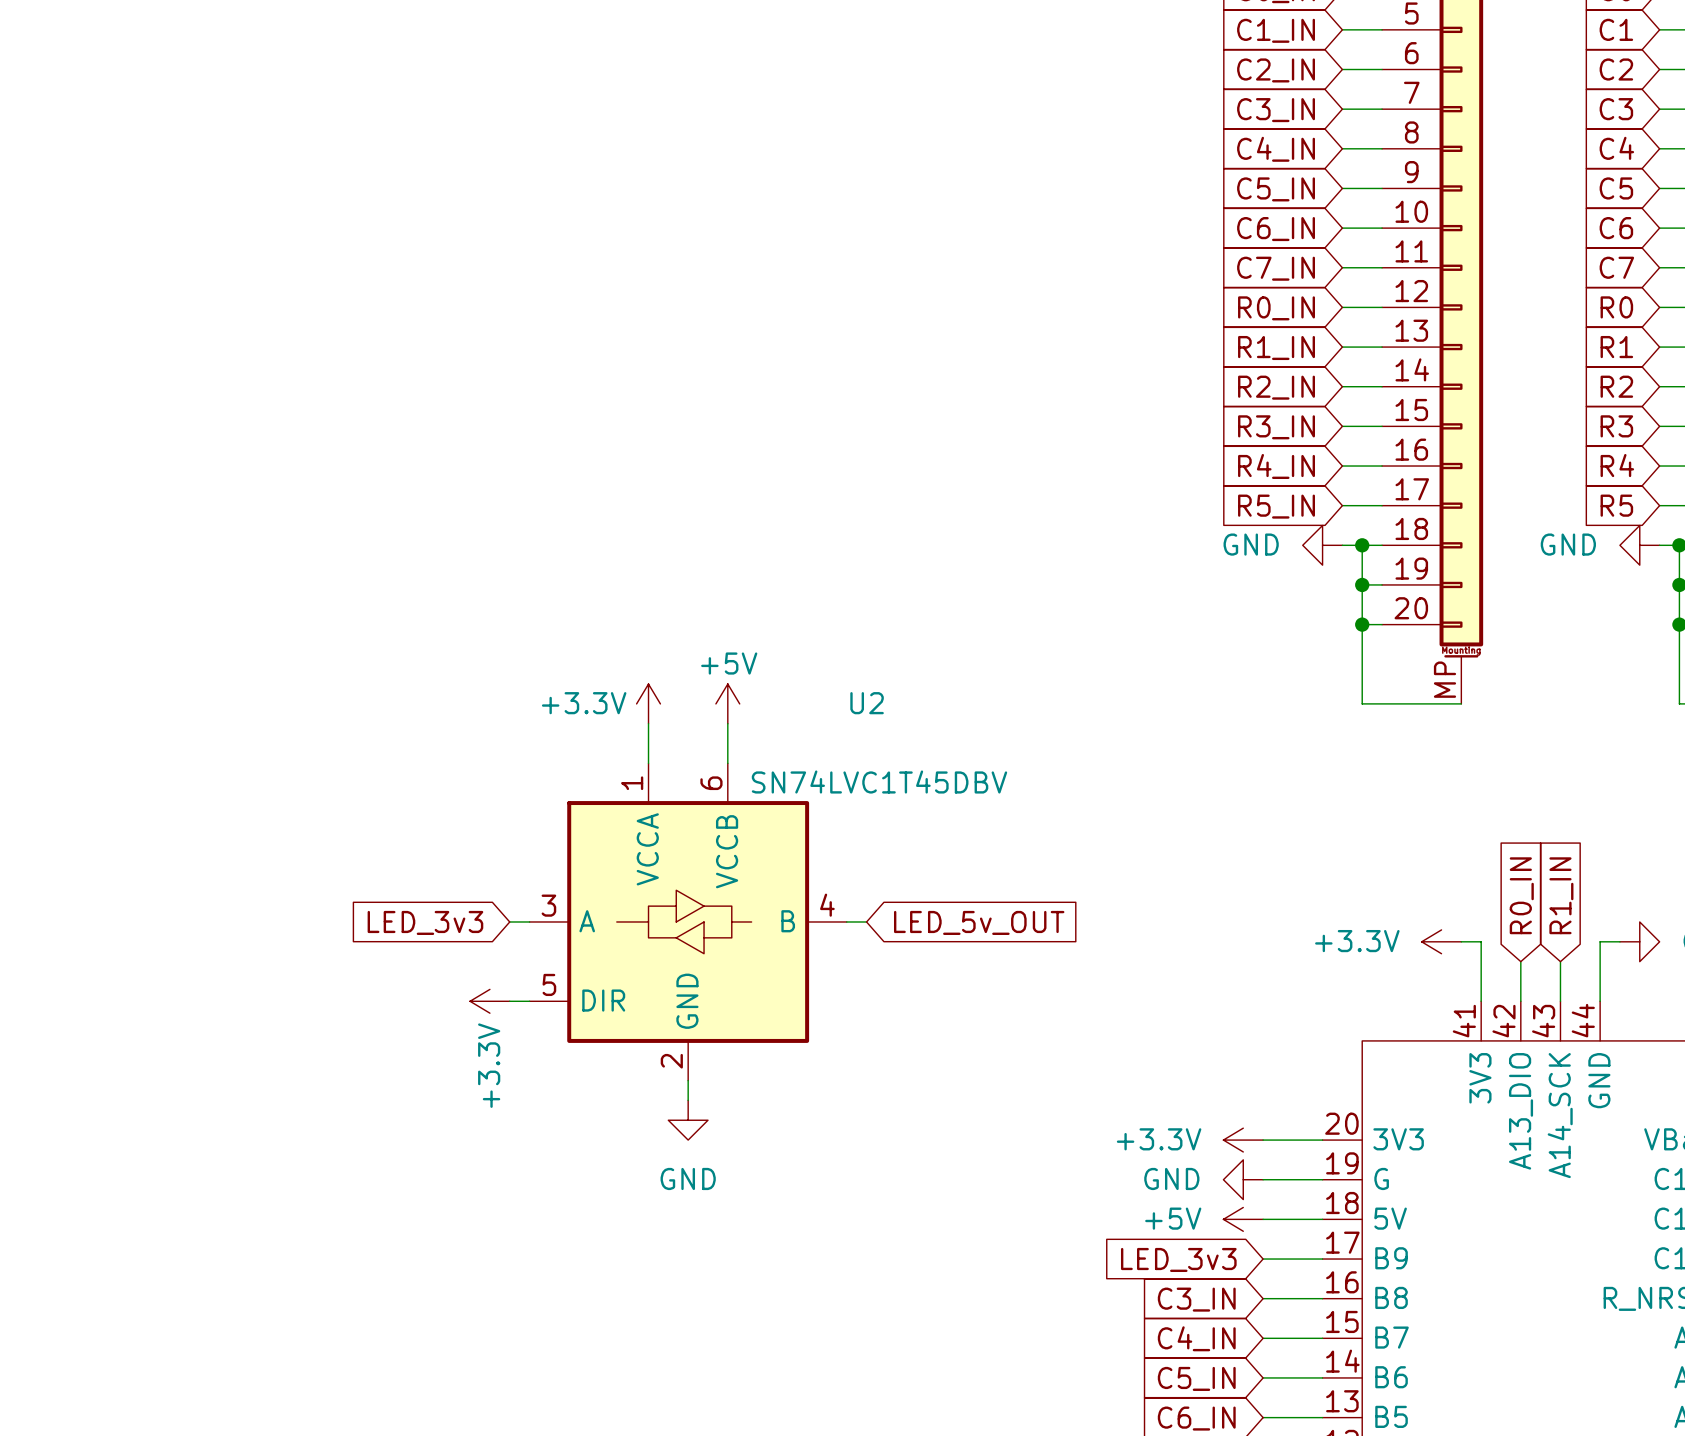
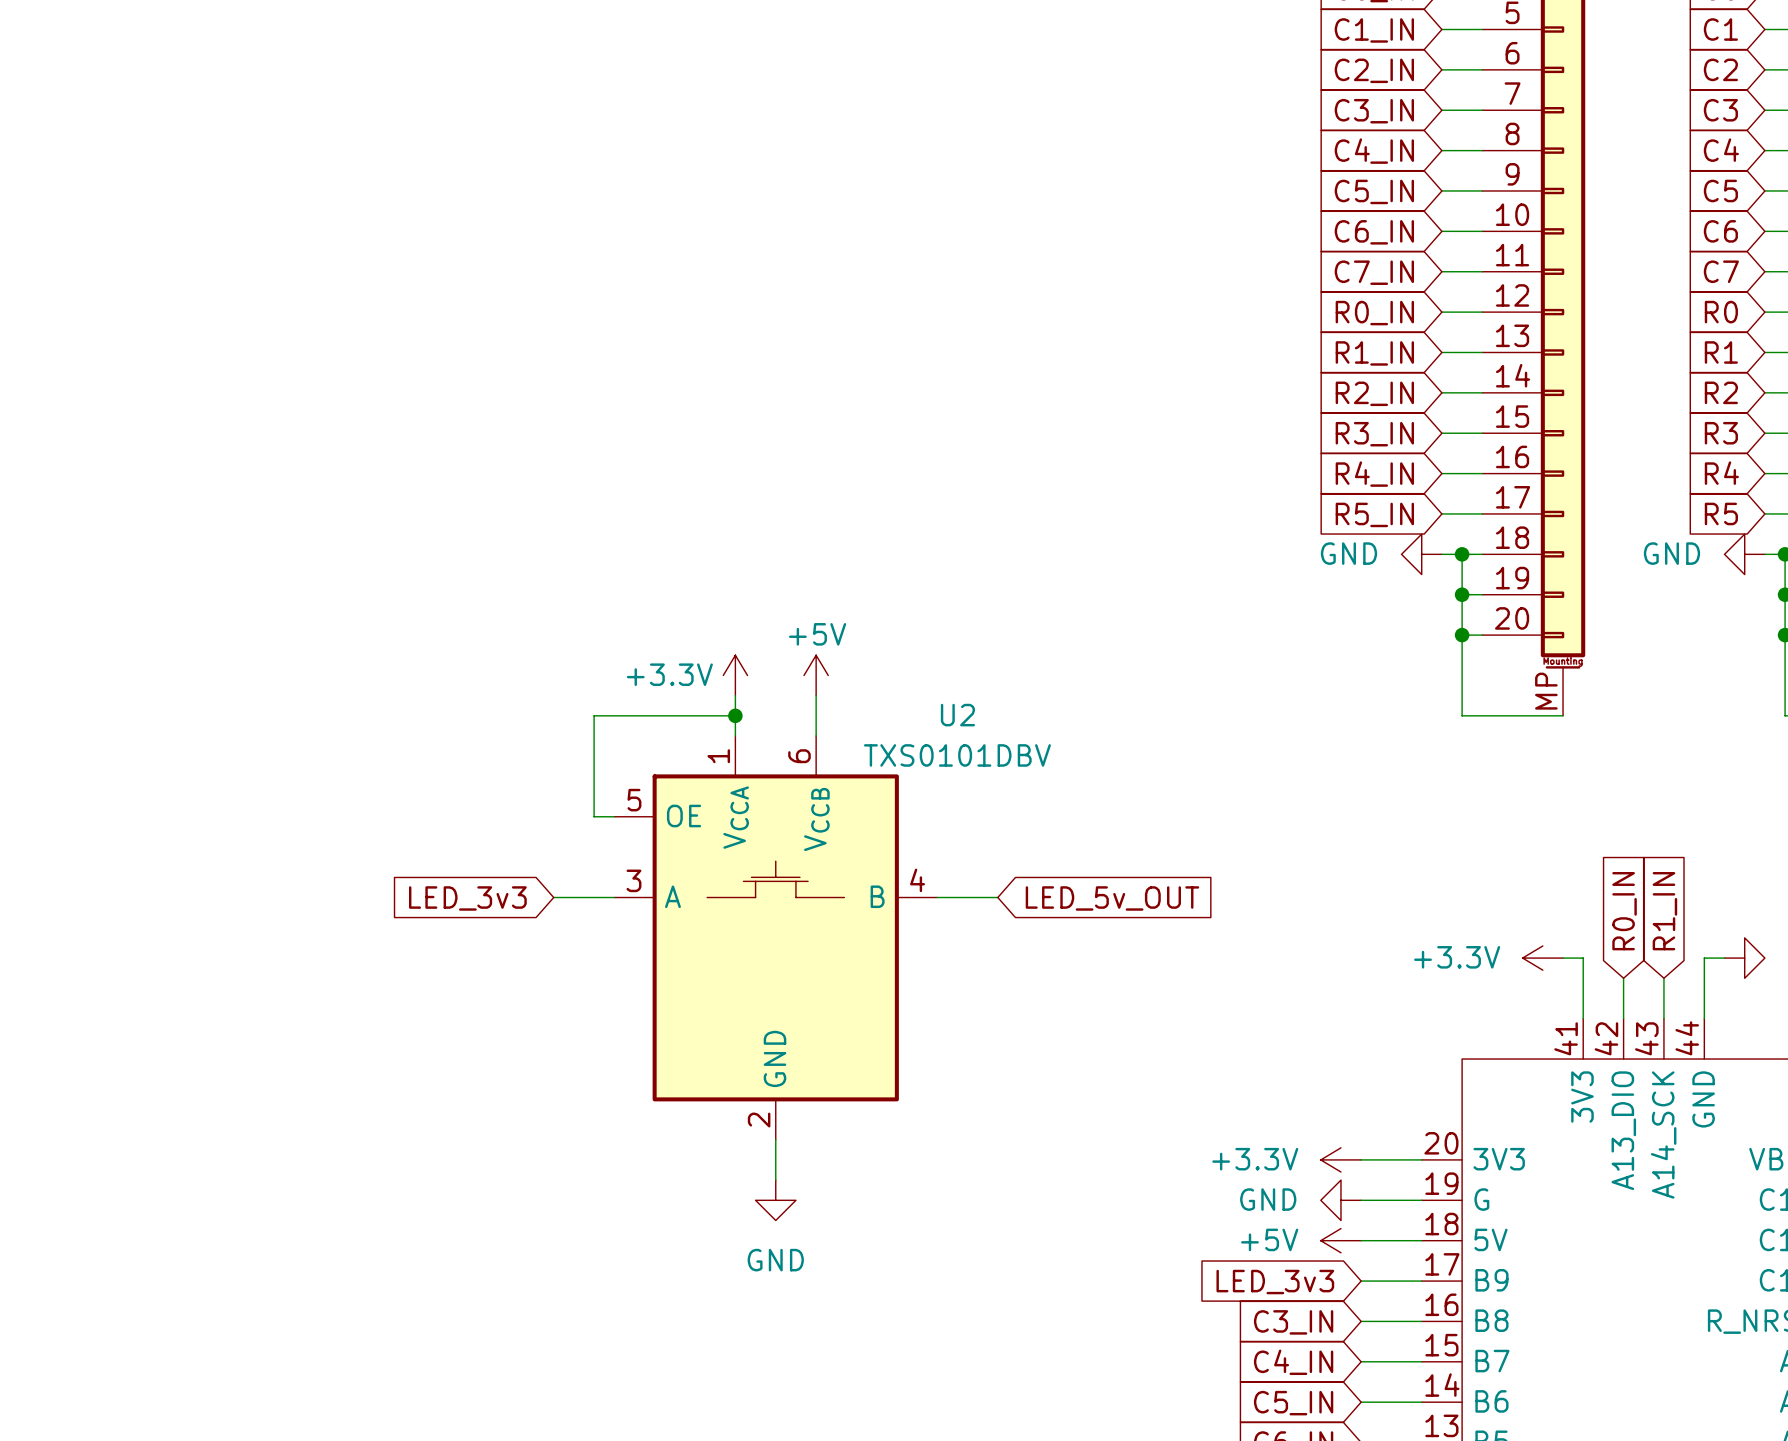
wire: none -> (735, 715) (594, 715) (594, 816) (614, 816)
power symbol position: +3.3V (648, 703) -> +3.3V (735, 675)
junction: none -> (735, 715)
power symbol position: +5V (727, 703) -> +5V (816, 675)
U2 symbol: [529, 763, 847, 1081] -> [614, 736, 938, 1140]
U2 value: SN74LVC1T45DBV (879, 782) -> TXS0101DBV (957, 755)
wire: none -> (553, 897) (614, 897)
wire: none -> (937, 897) (997, 897)
wire: (509, 921) (529, 921) -> none
wire: (846, 921) (866, 921) -> none
global label position: LED_3v3 (425, 922) -> LED_3v3 (467, 898)
global label position: LED_5v_OUT (979, 922) -> LED_5v_OUT (1112, 898)
power symbol: +3.3V (489, 1001) -> none
wire: (509, 1001) (529, 1001) -> none
wire: none -> (775, 1139) (775, 1180)
power symbol position: GND (688, 1120) -> GND (775, 1200)

